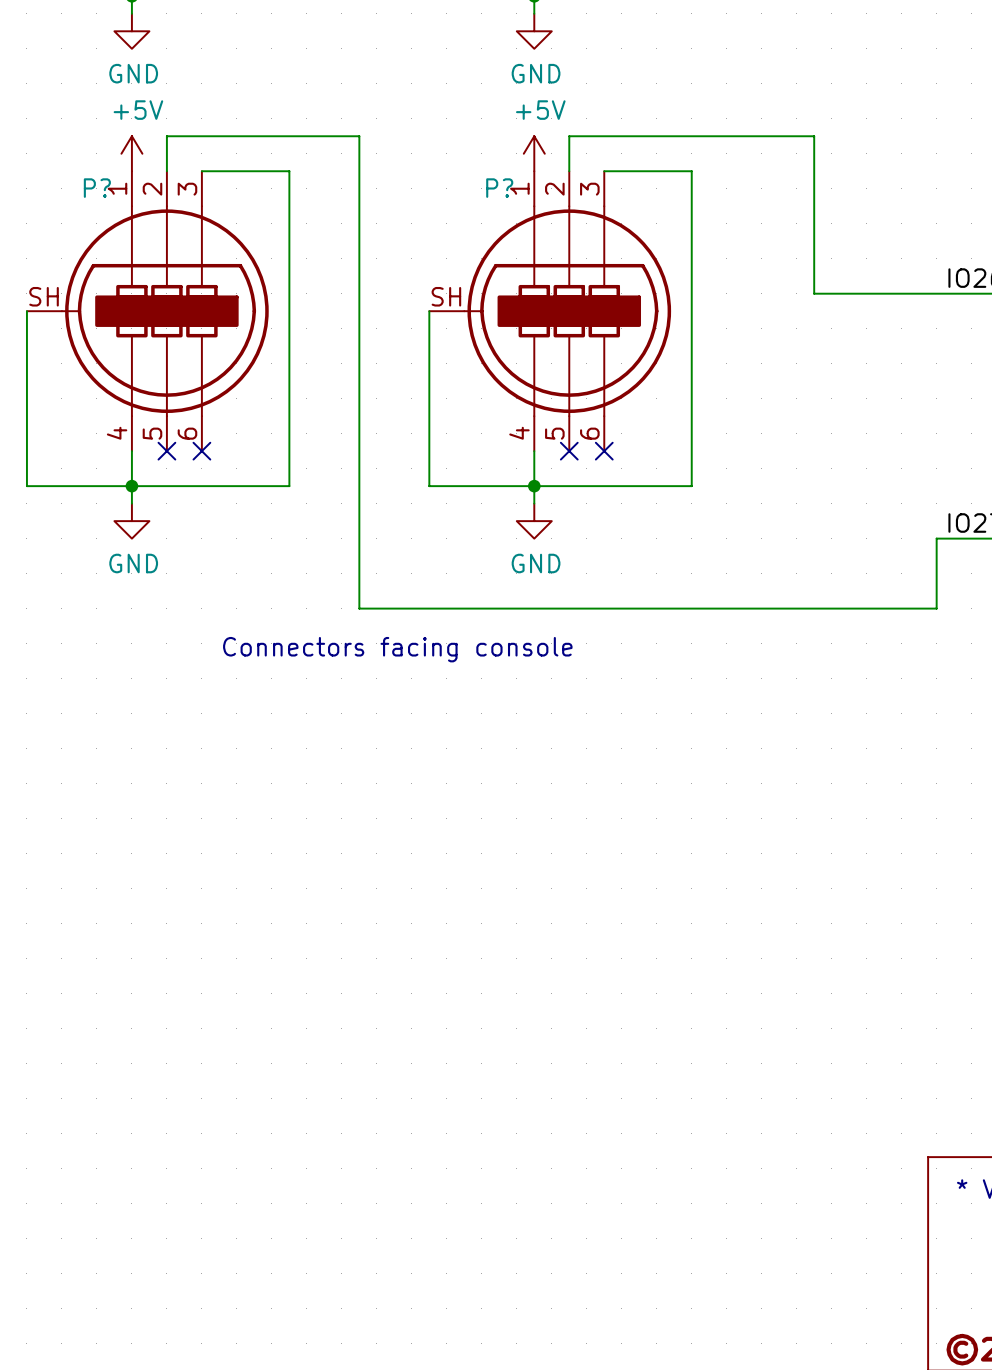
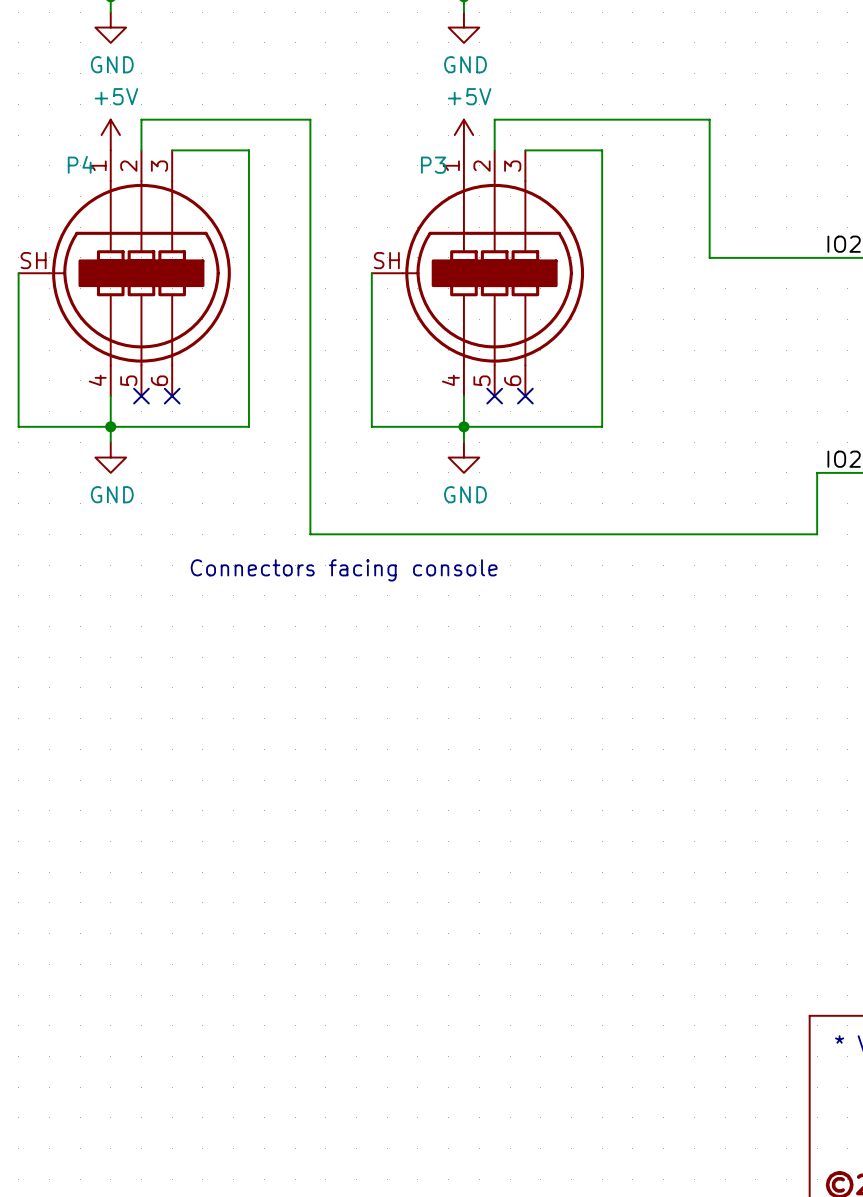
P? name: P? (97, 188) -> P4 (80, 164)
P? name: P? (499, 188) -> P3 (433, 165)

